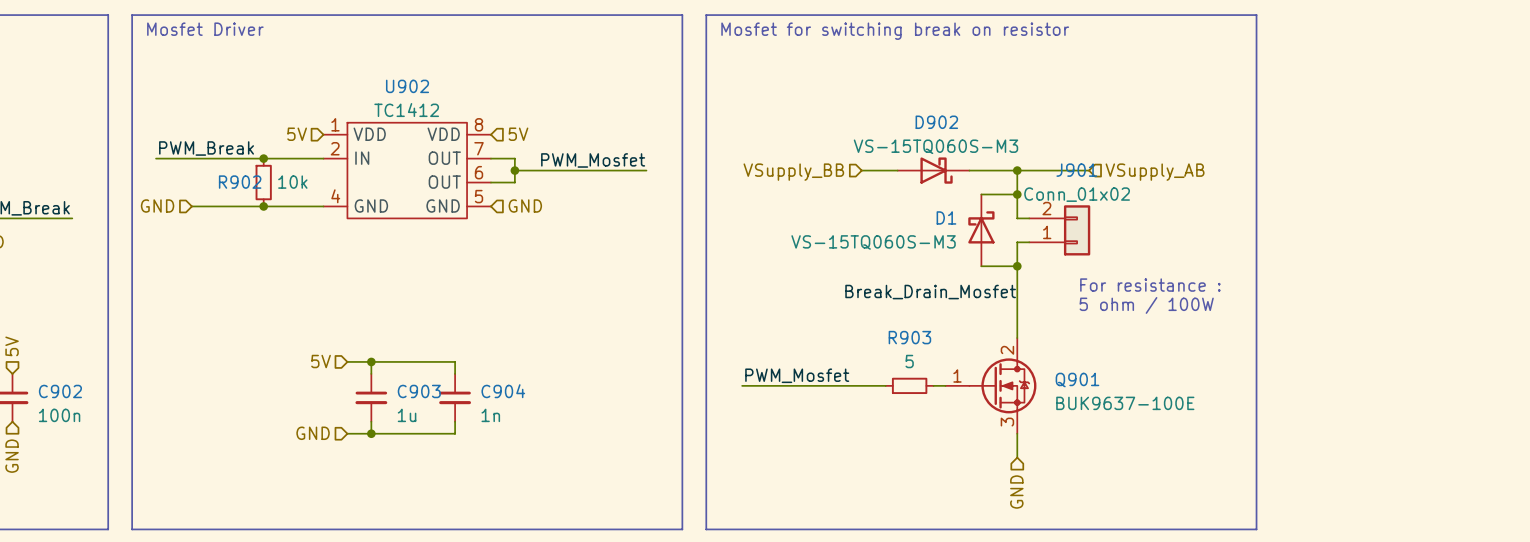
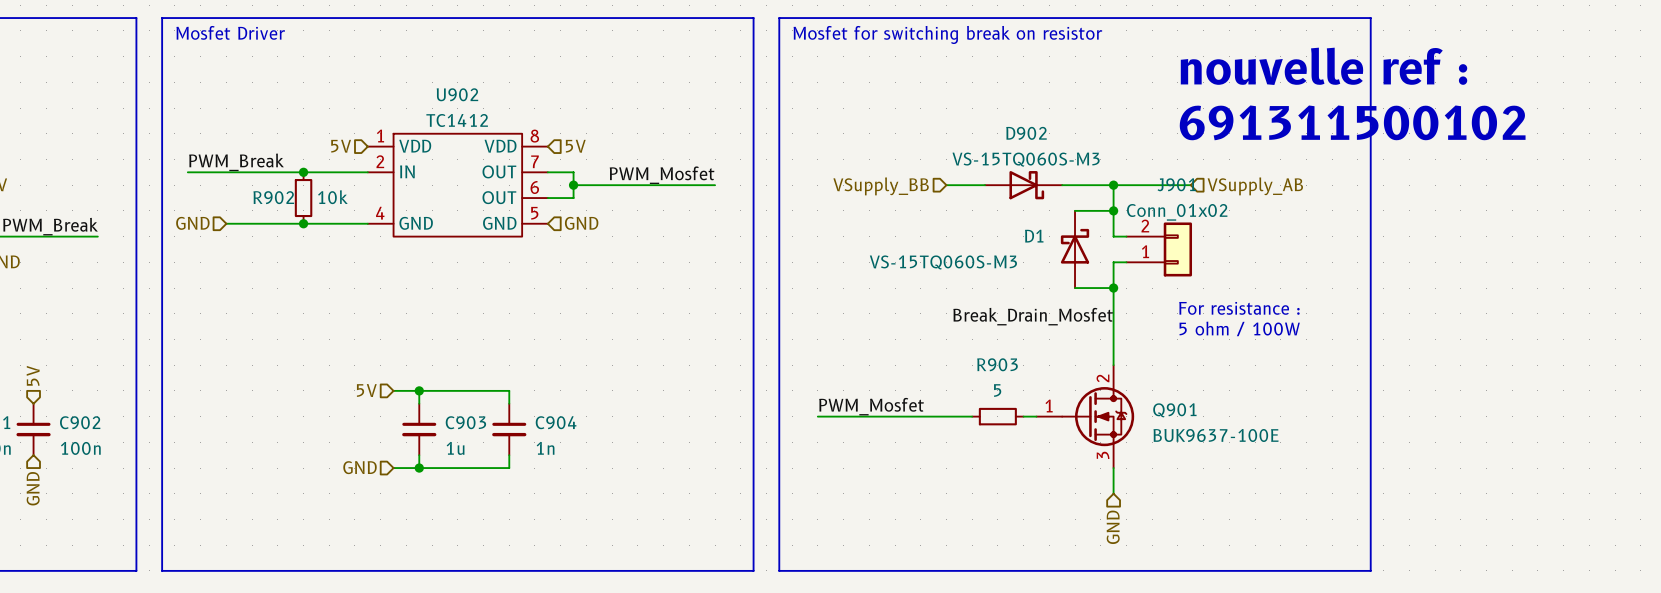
text: none -> nouvelle ref : (1324, 66)
text: none -> 691311500102 (1352, 122)

